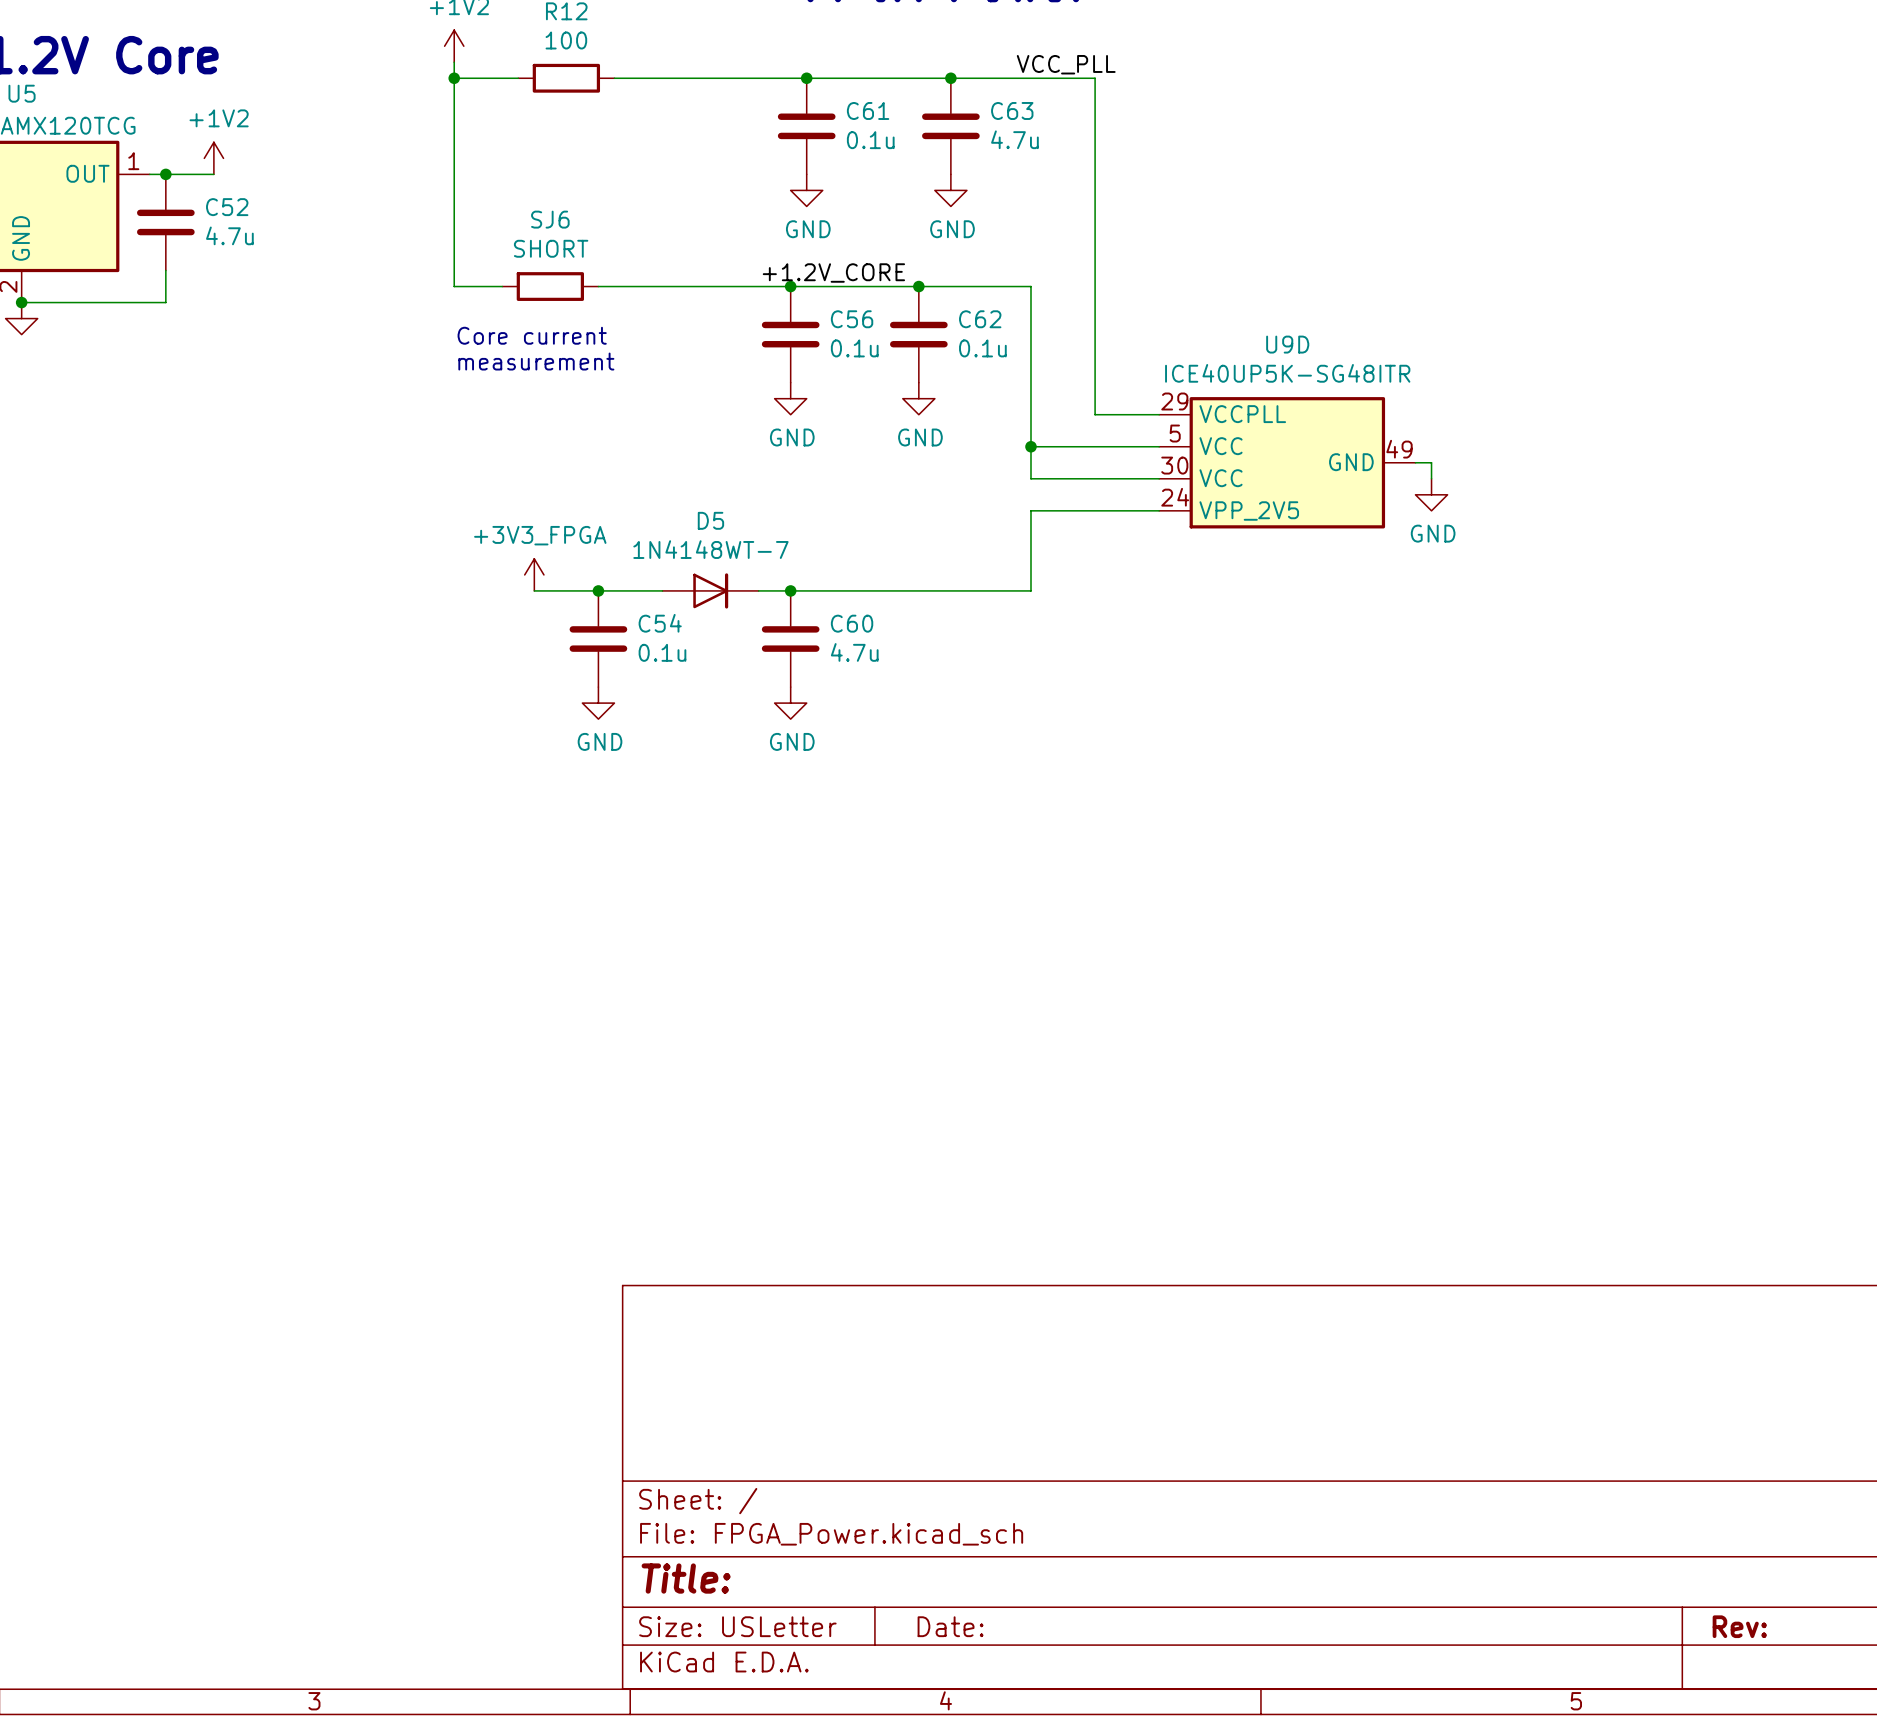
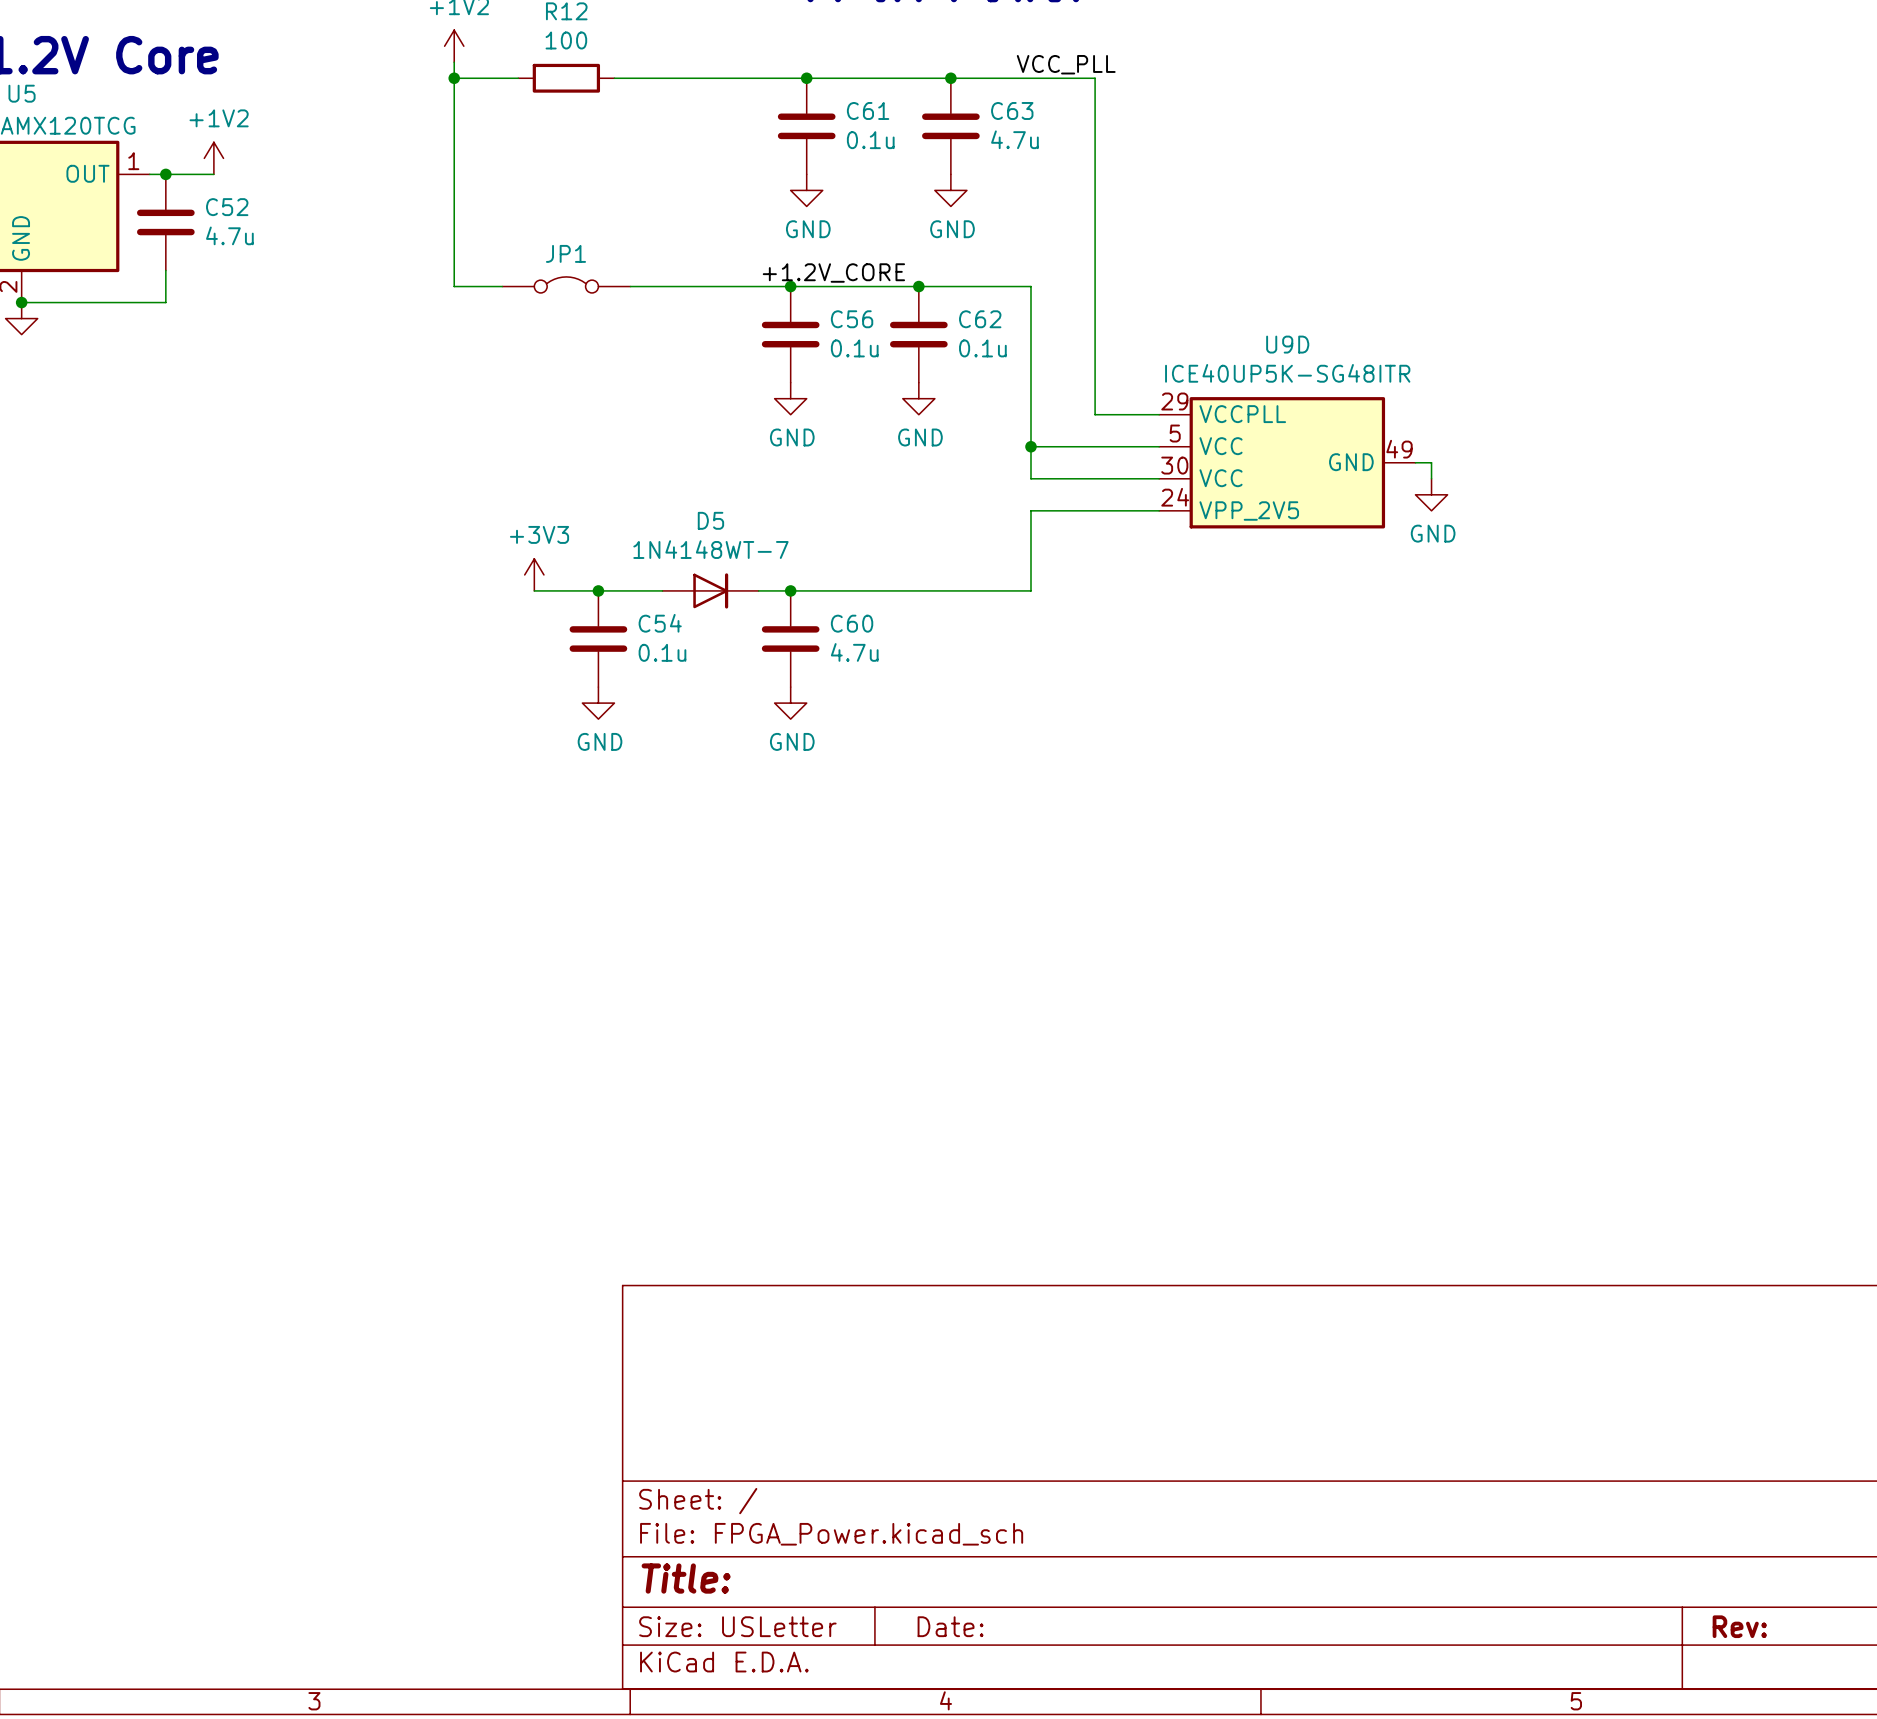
JP1: none -> (566, 284)
SJ6: SHORT (550, 286) -> none
text: Core current (532, 335) -> none
text: measurement (536, 361) -> none
power symbol: +3V3_FPGA (534, 574) -> +3V3 (534, 574)

